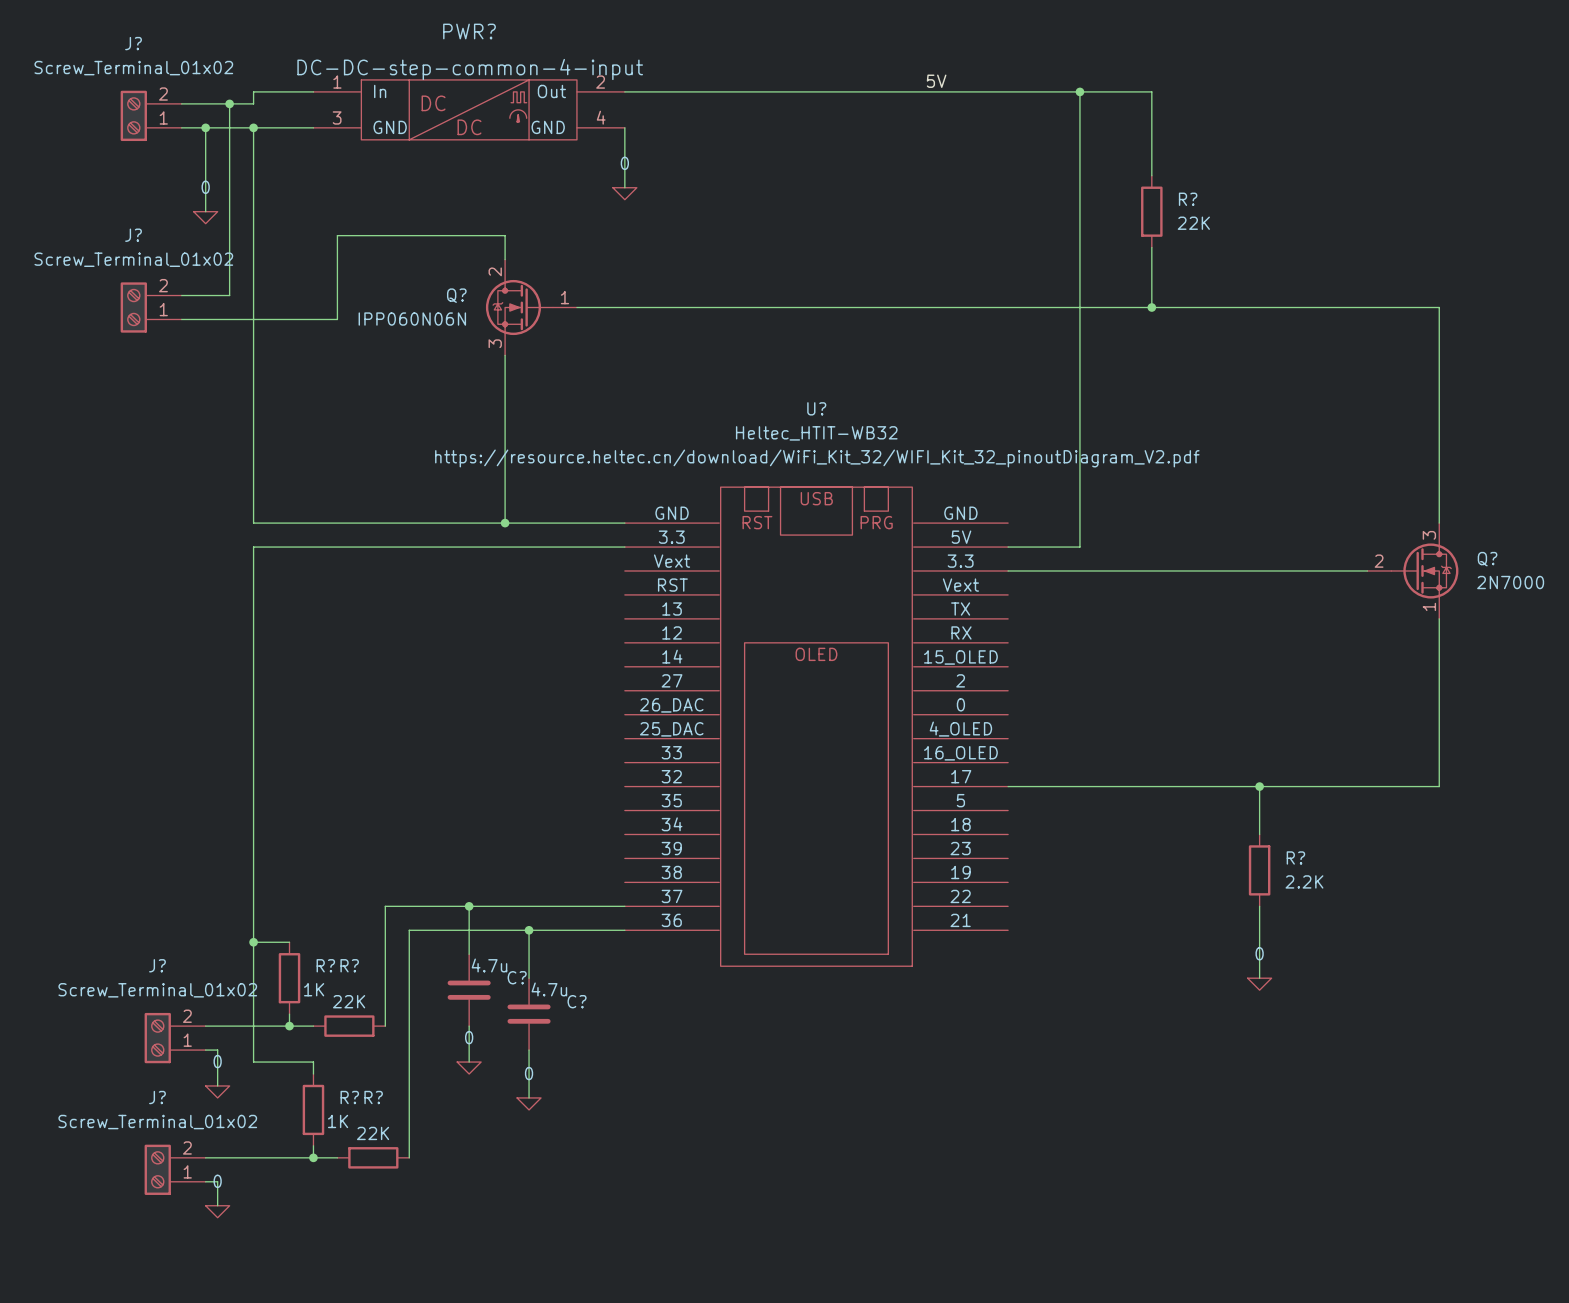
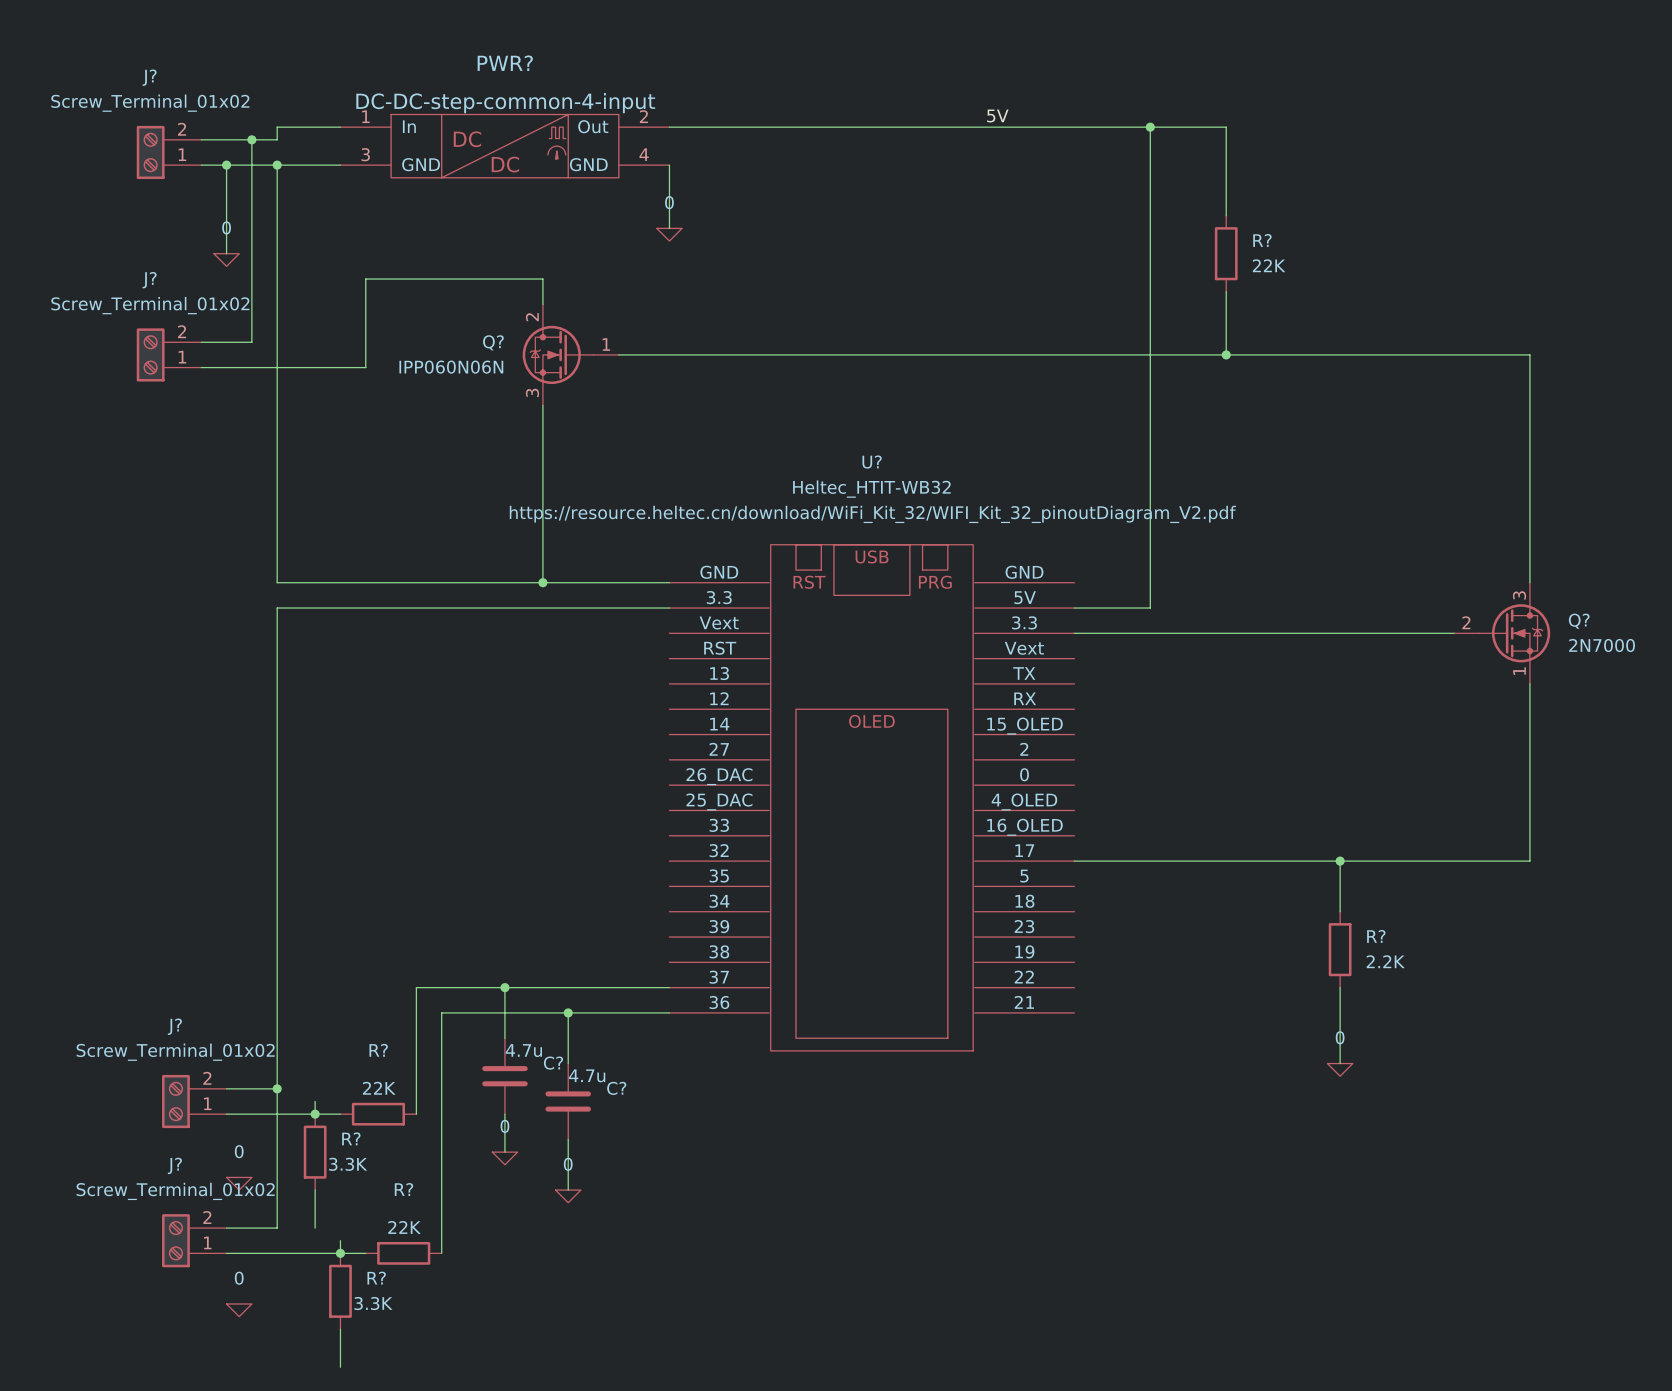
wire: (253, 942) (289, 942) -> none
junction: (253, 942) -> none
R?: 1K (289, 978) -> none
wire: none -> (226, 1088) (277, 1088)
junction: none -> (277, 1088)
J? position: (175, 1038) -> (194, 1101)
wire: (205, 1050) (217, 1050) (217, 1085) -> none
wire: (253, 1062) (313, 1062) (313, 1074) -> (277, 1152) (277, 1228) (226, 1228)
R?: none -> 3.3K (315, 1152)
wire: none -> (315, 1190) (315, 1228)
R?: 1K (313, 1109) -> none
J? position: (175, 1169) -> (194, 1240)
wire: (205, 1181) (217, 1181) (217, 1205) -> none
R?: none -> 3.3K (340, 1291)
wire: none -> (340, 1329) (340, 1367)

